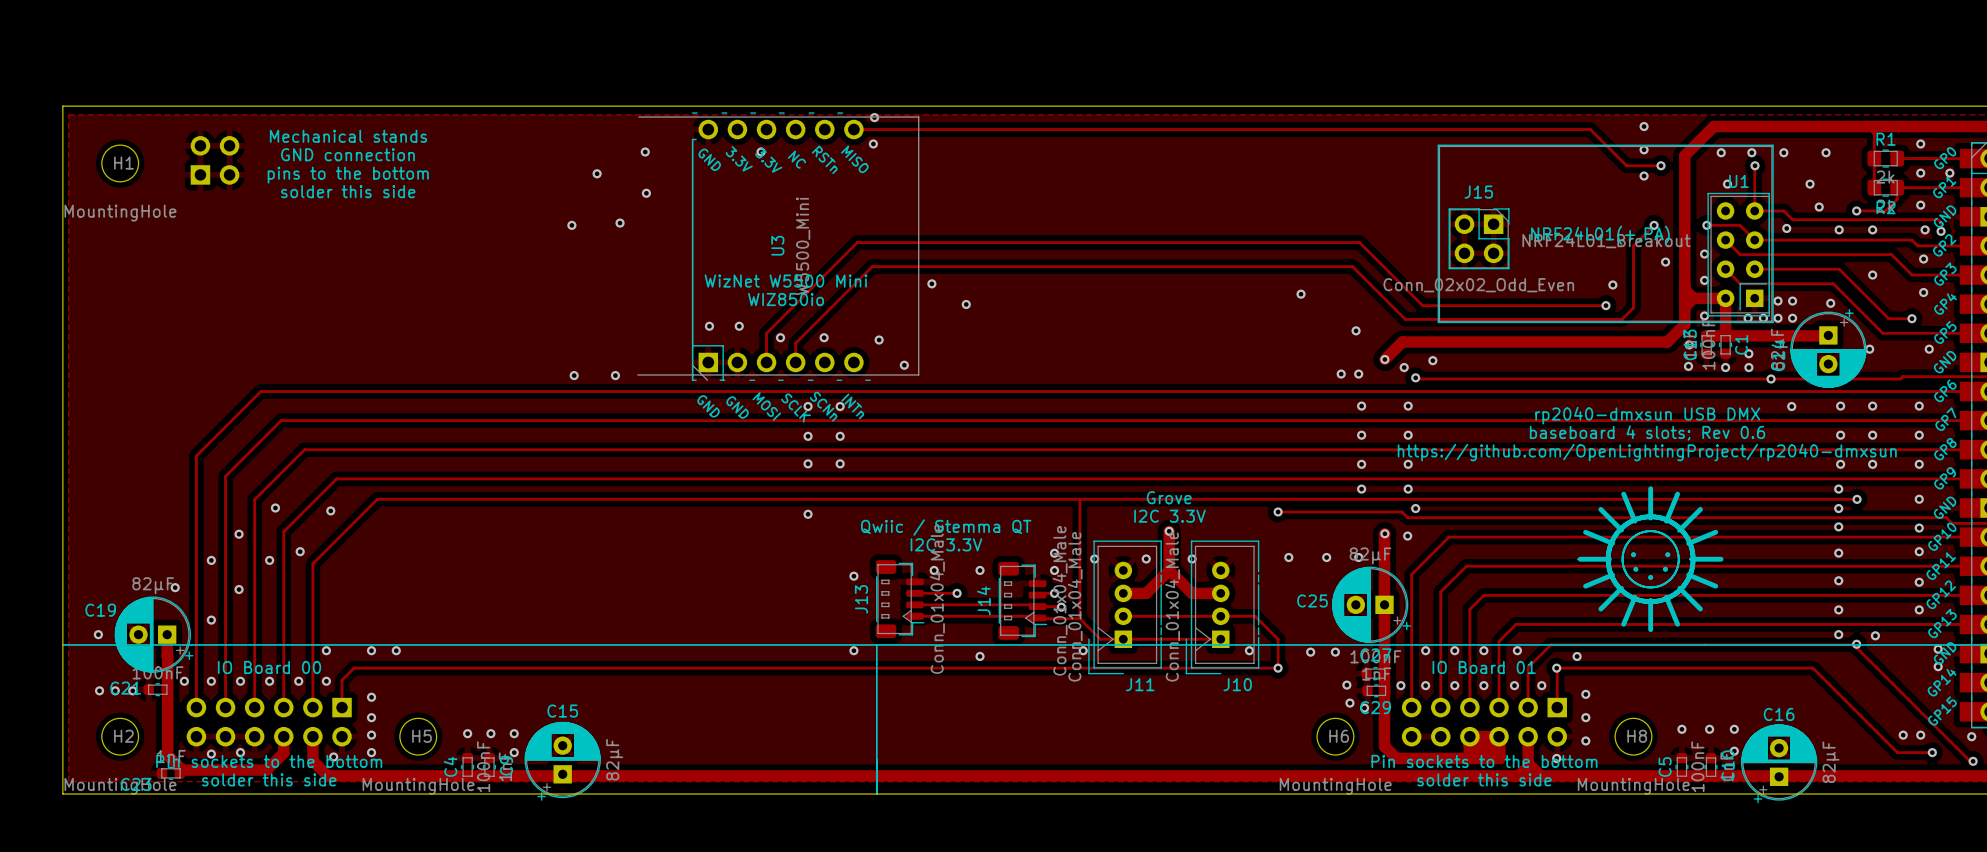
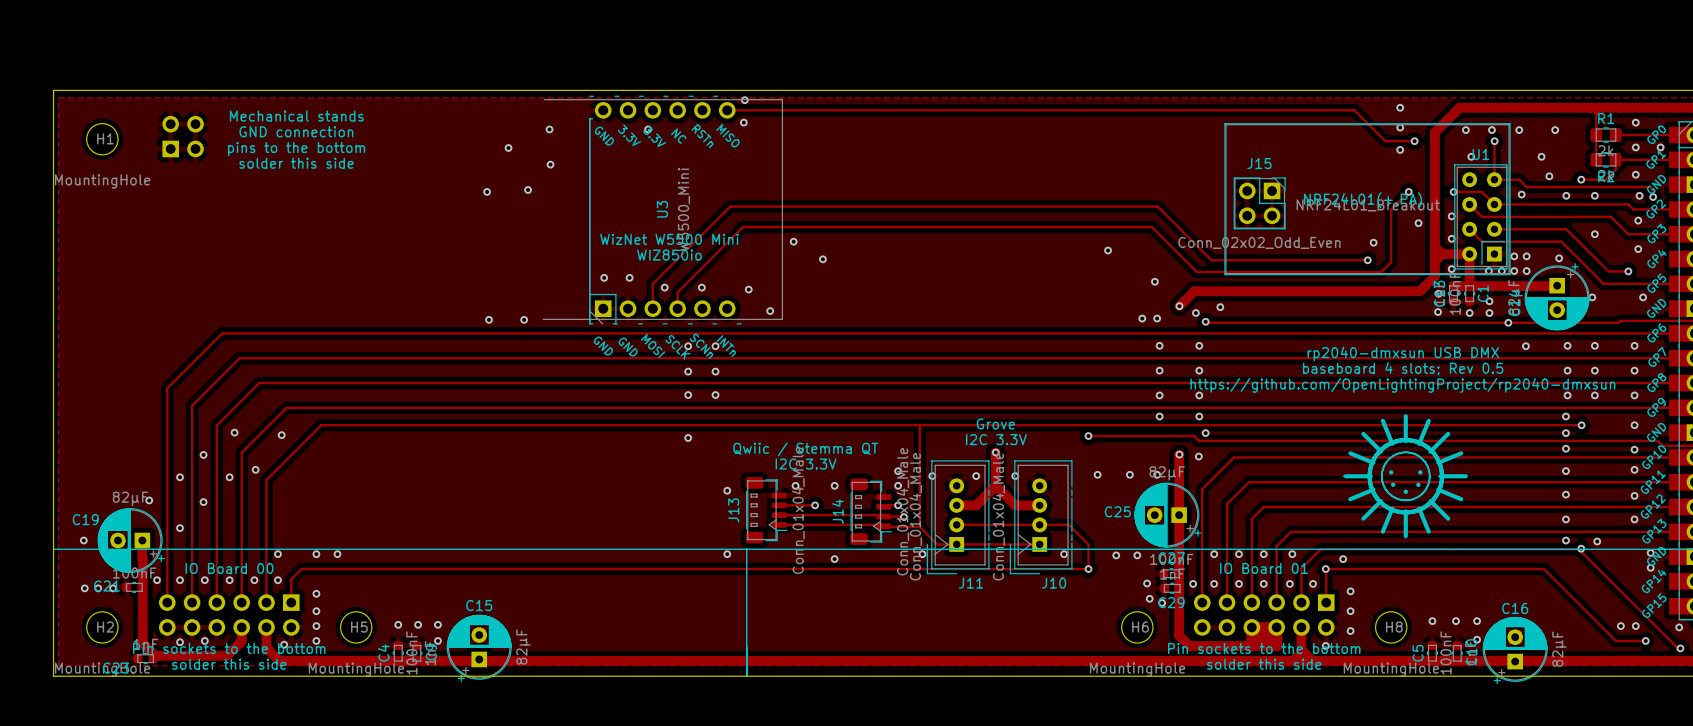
text: baseboard 4 slots; Rev 0.6 (1647, 433) -> baseboard 4 slots; Rev 0.5 (1403, 368)

